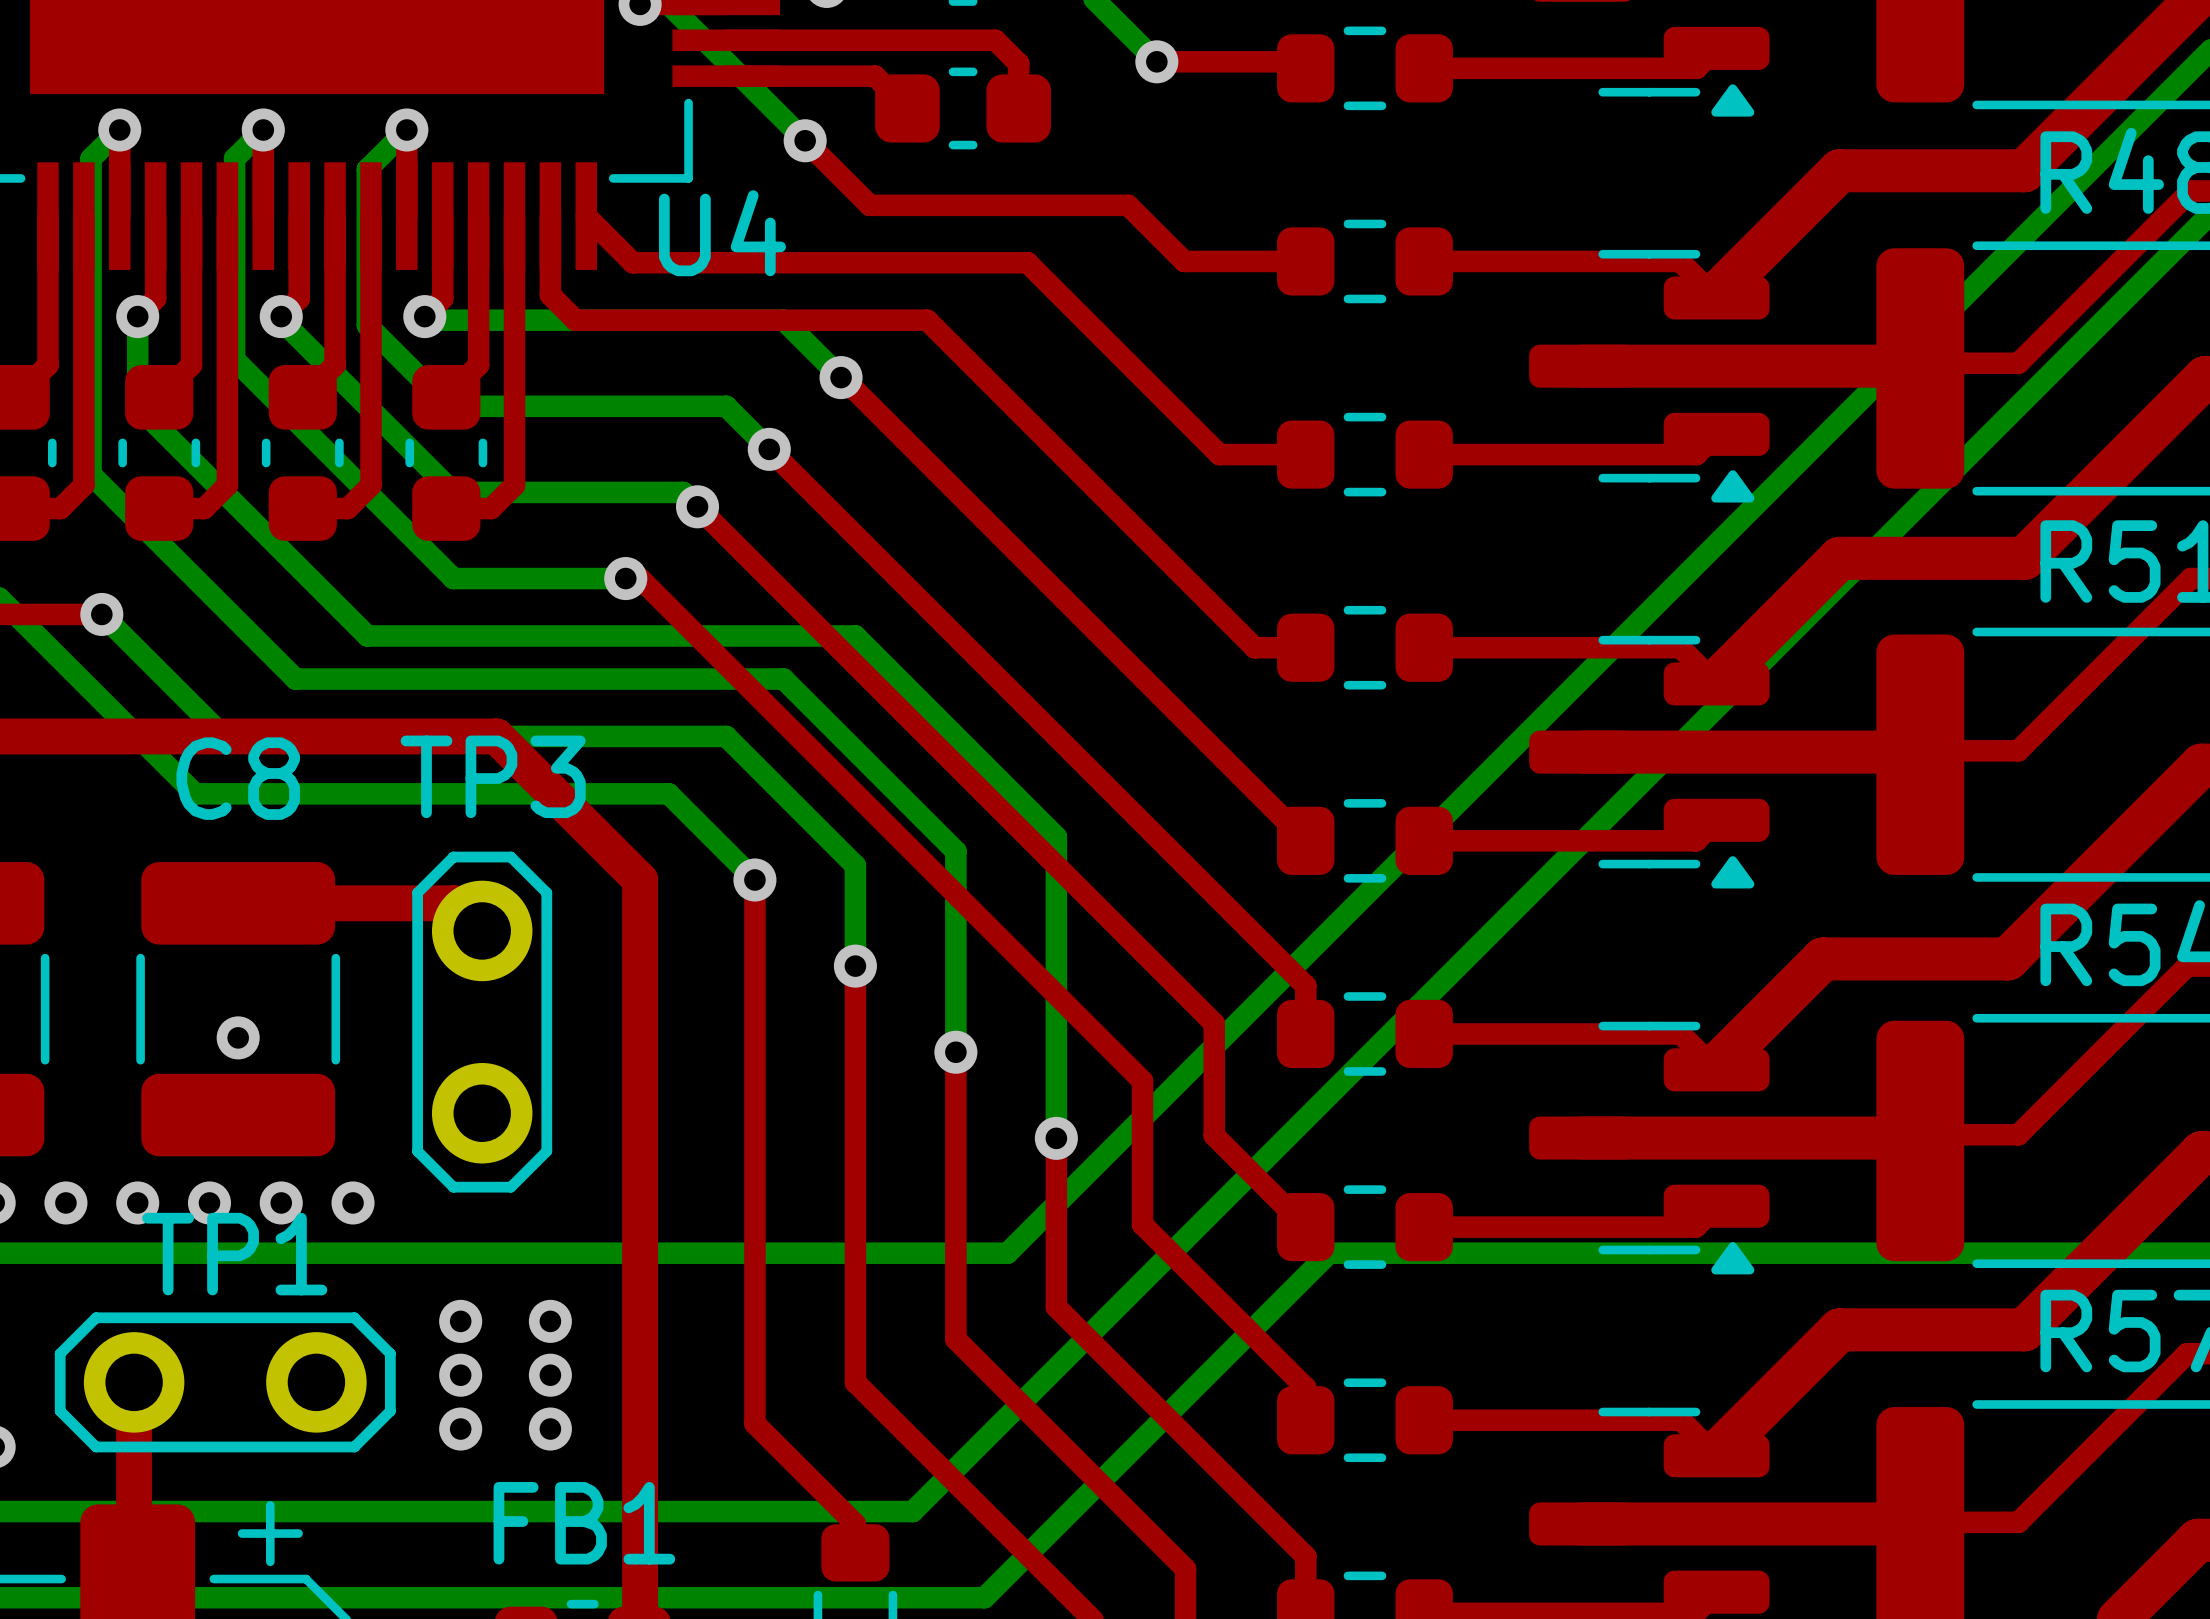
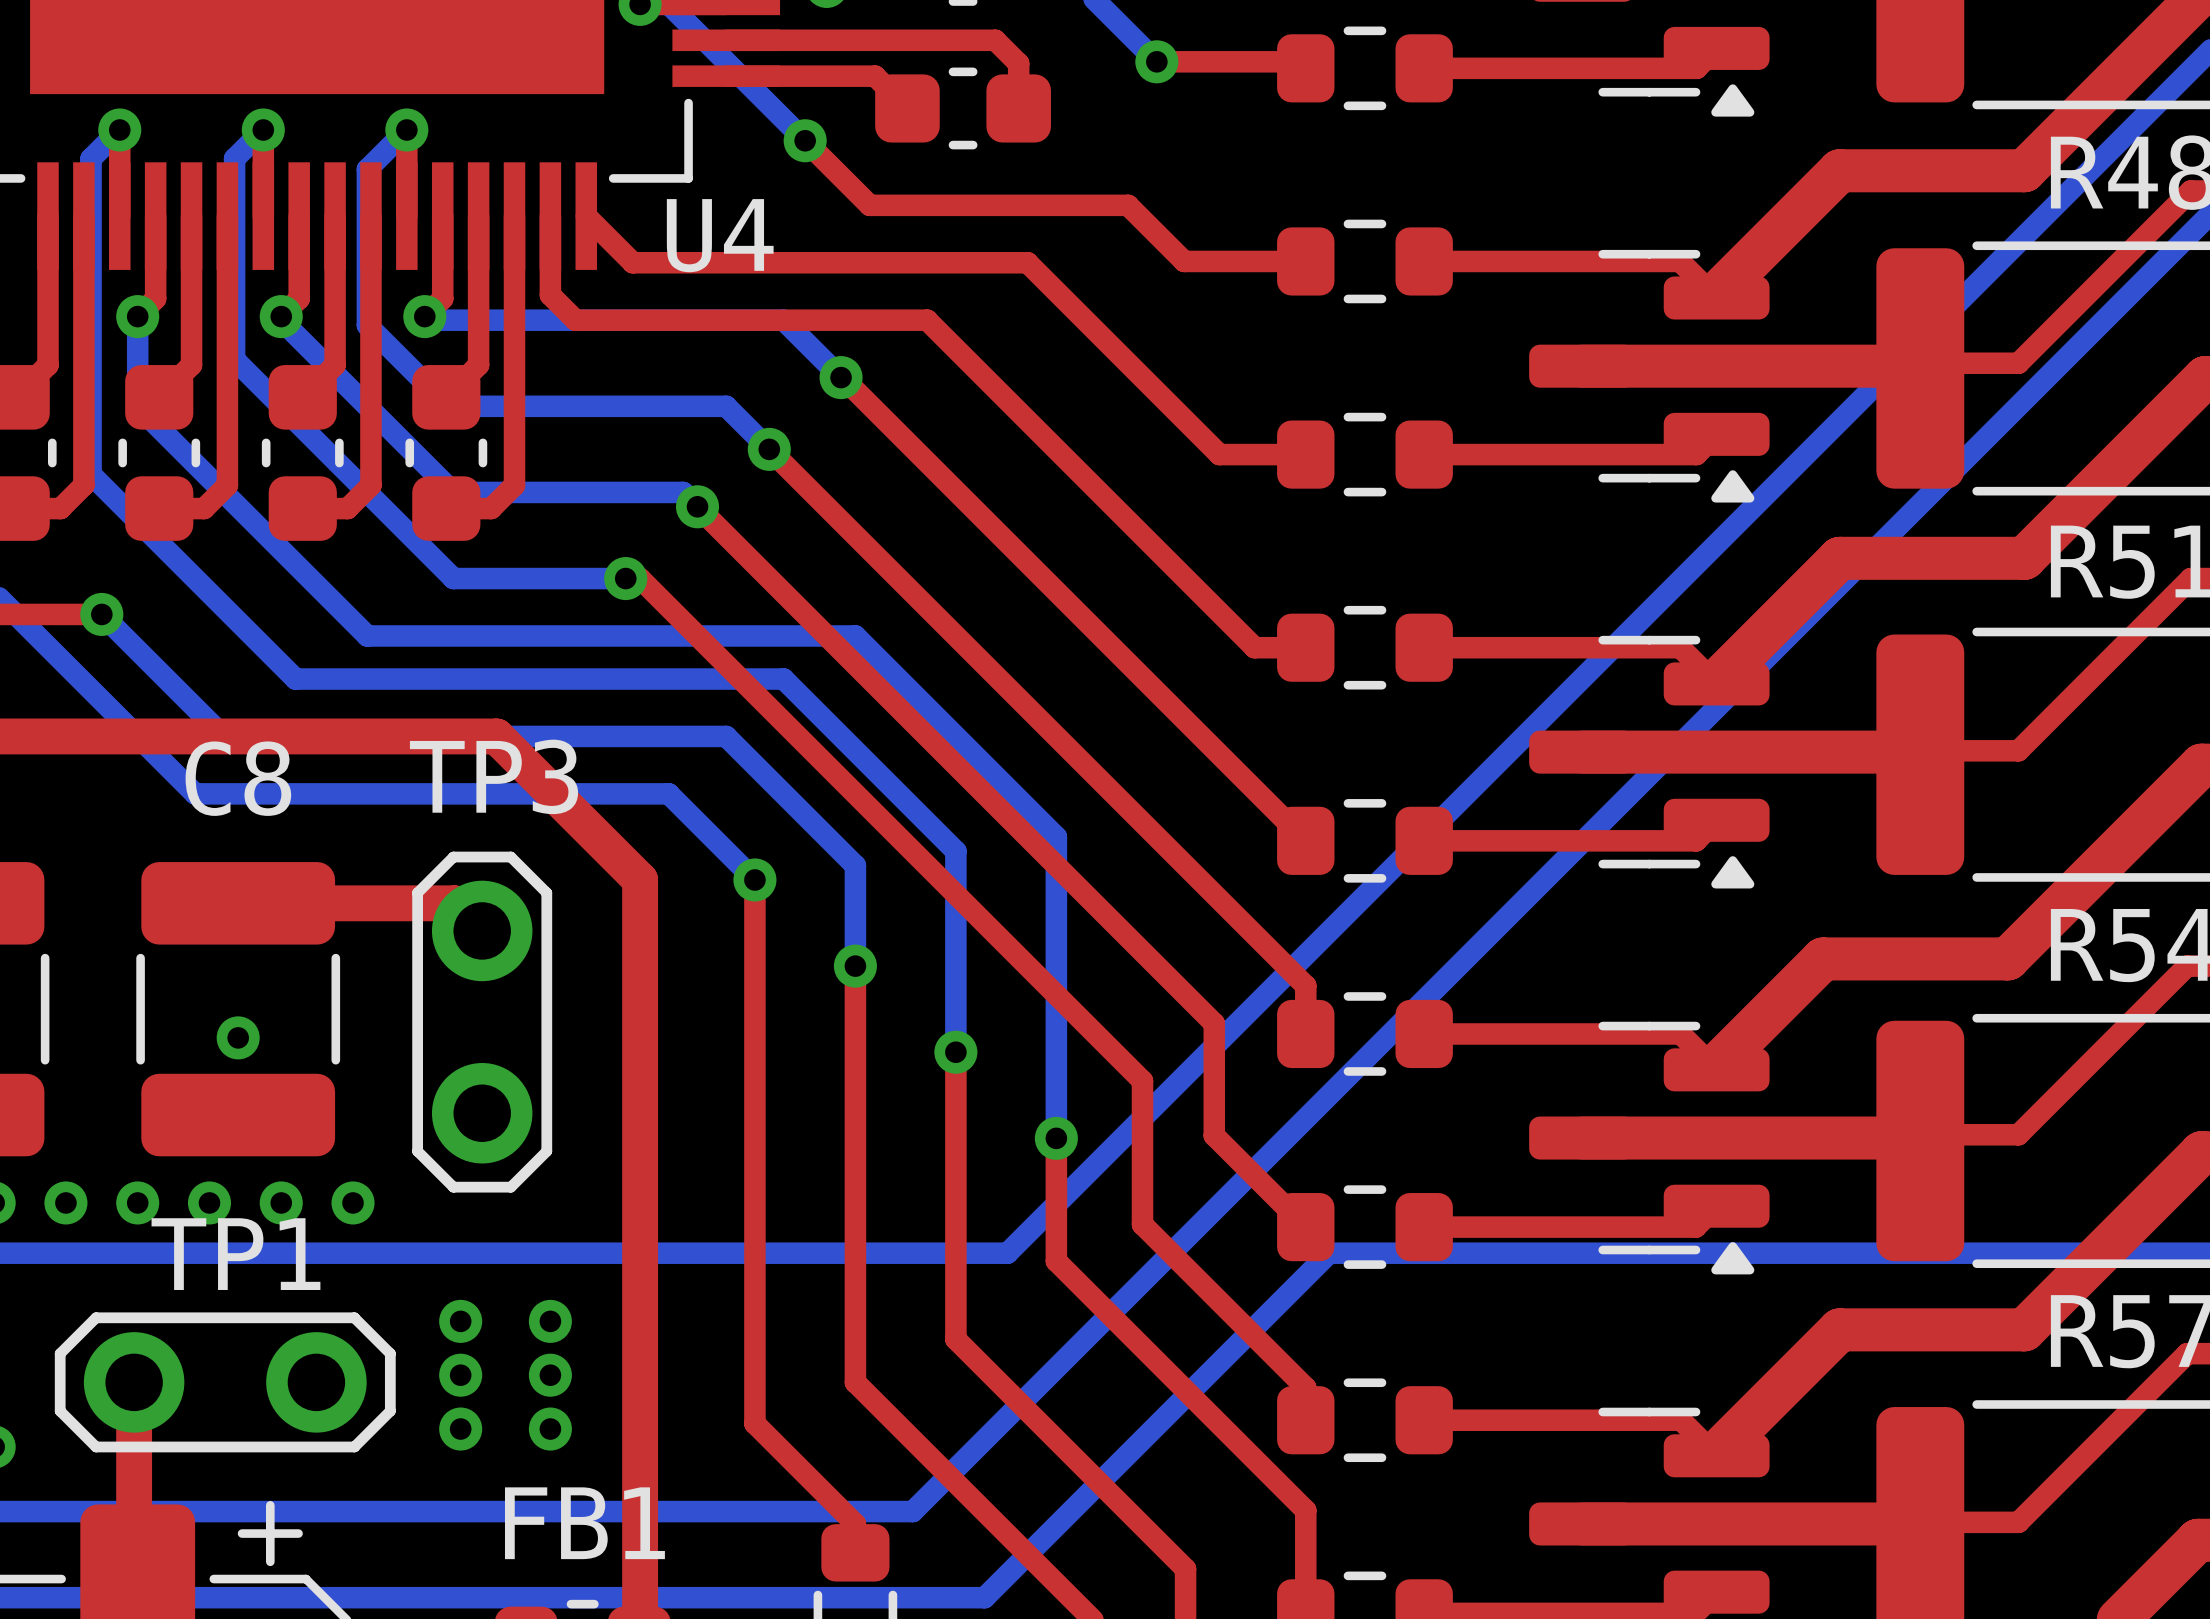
top track: (1056, 1261) (1056, 1307) (1305, 1556) -> (1056, 1261) (1305, 1510) (1305, 1556)

